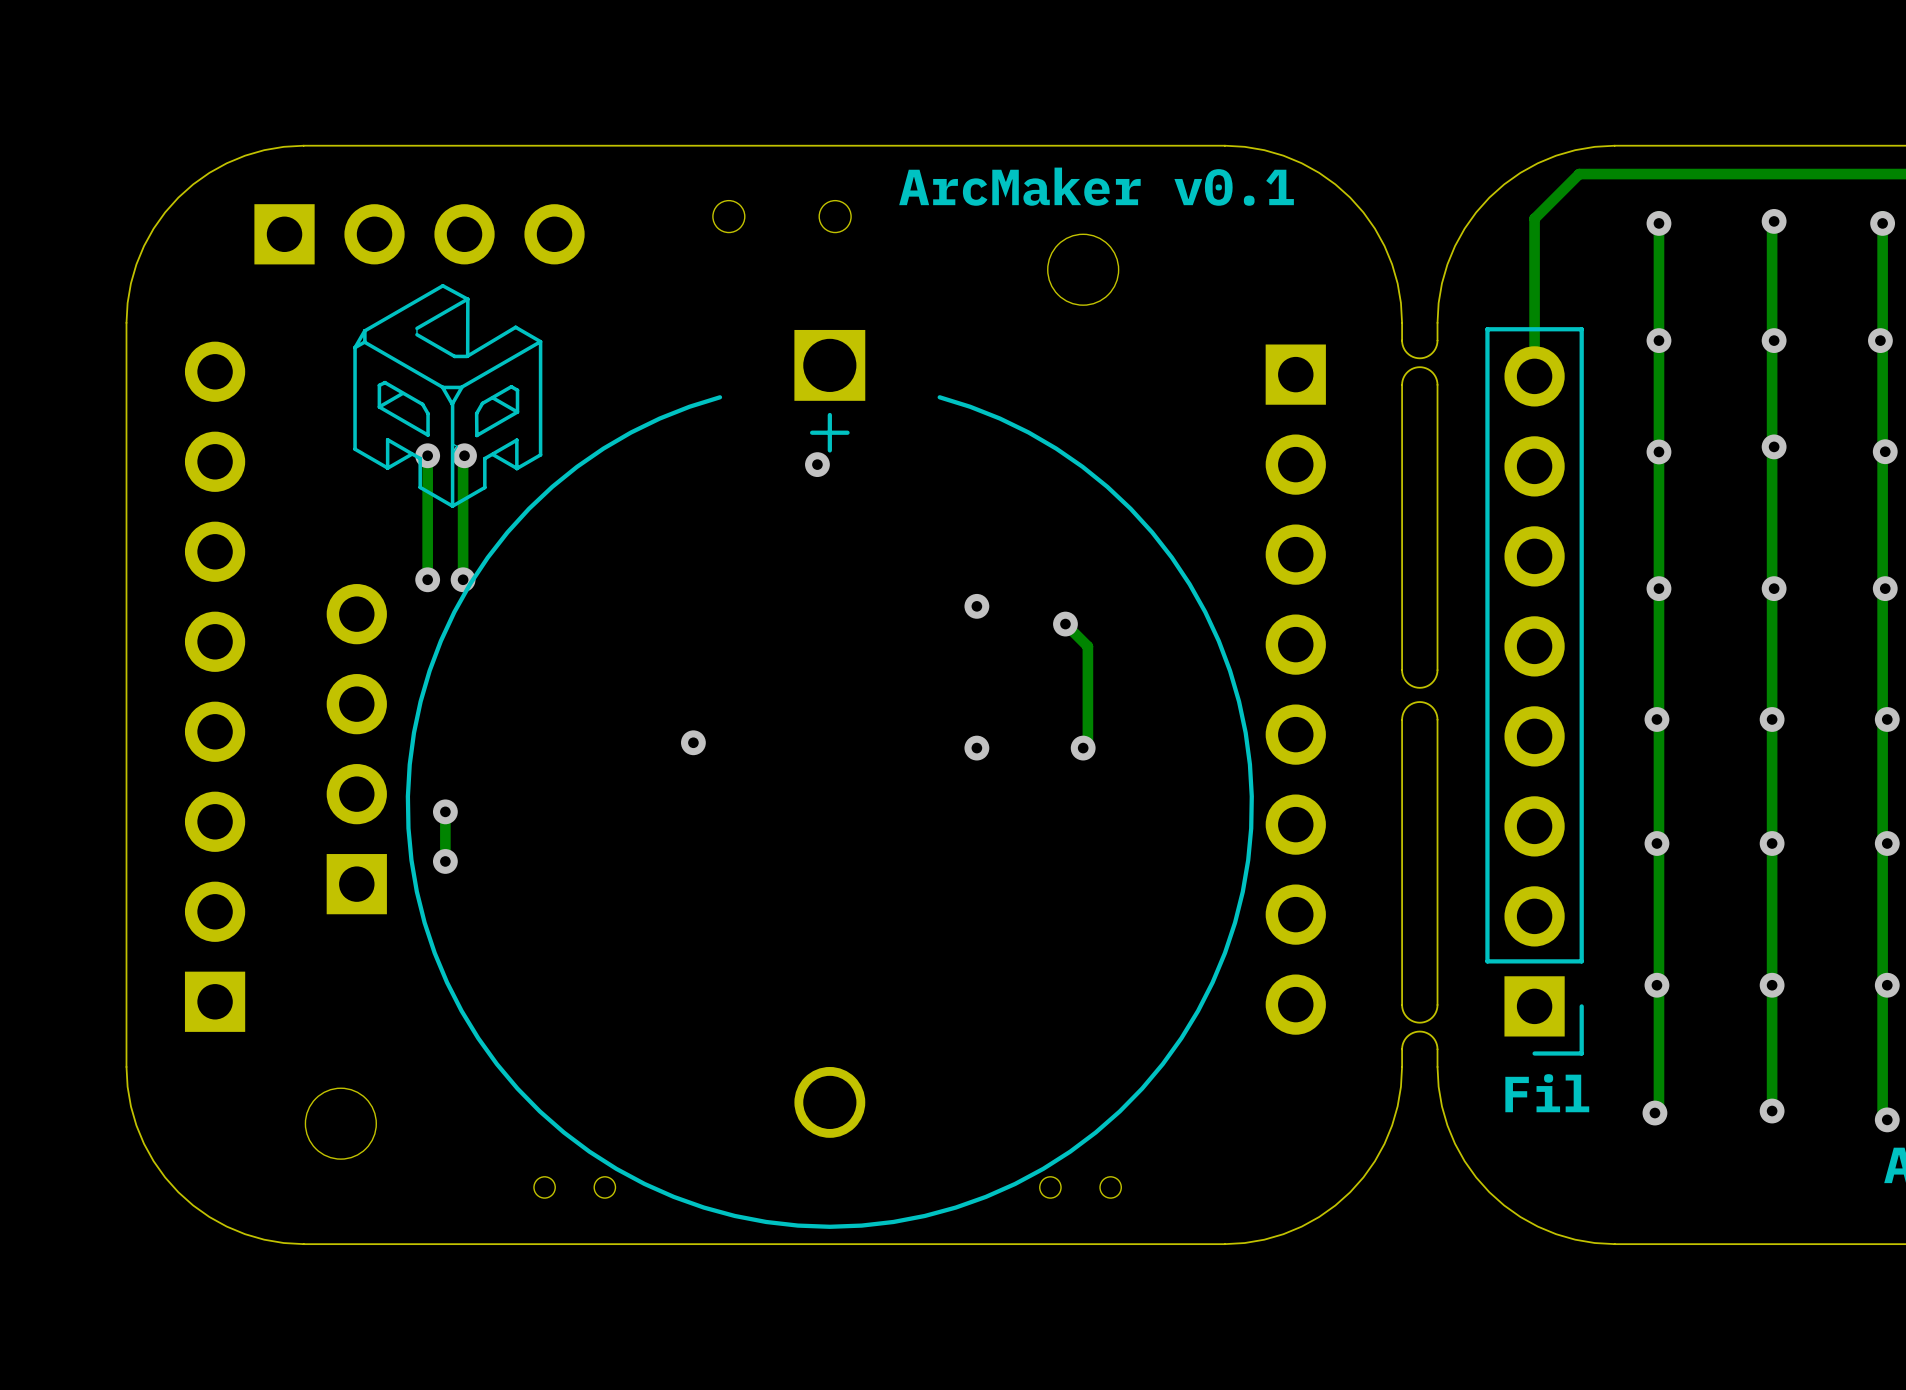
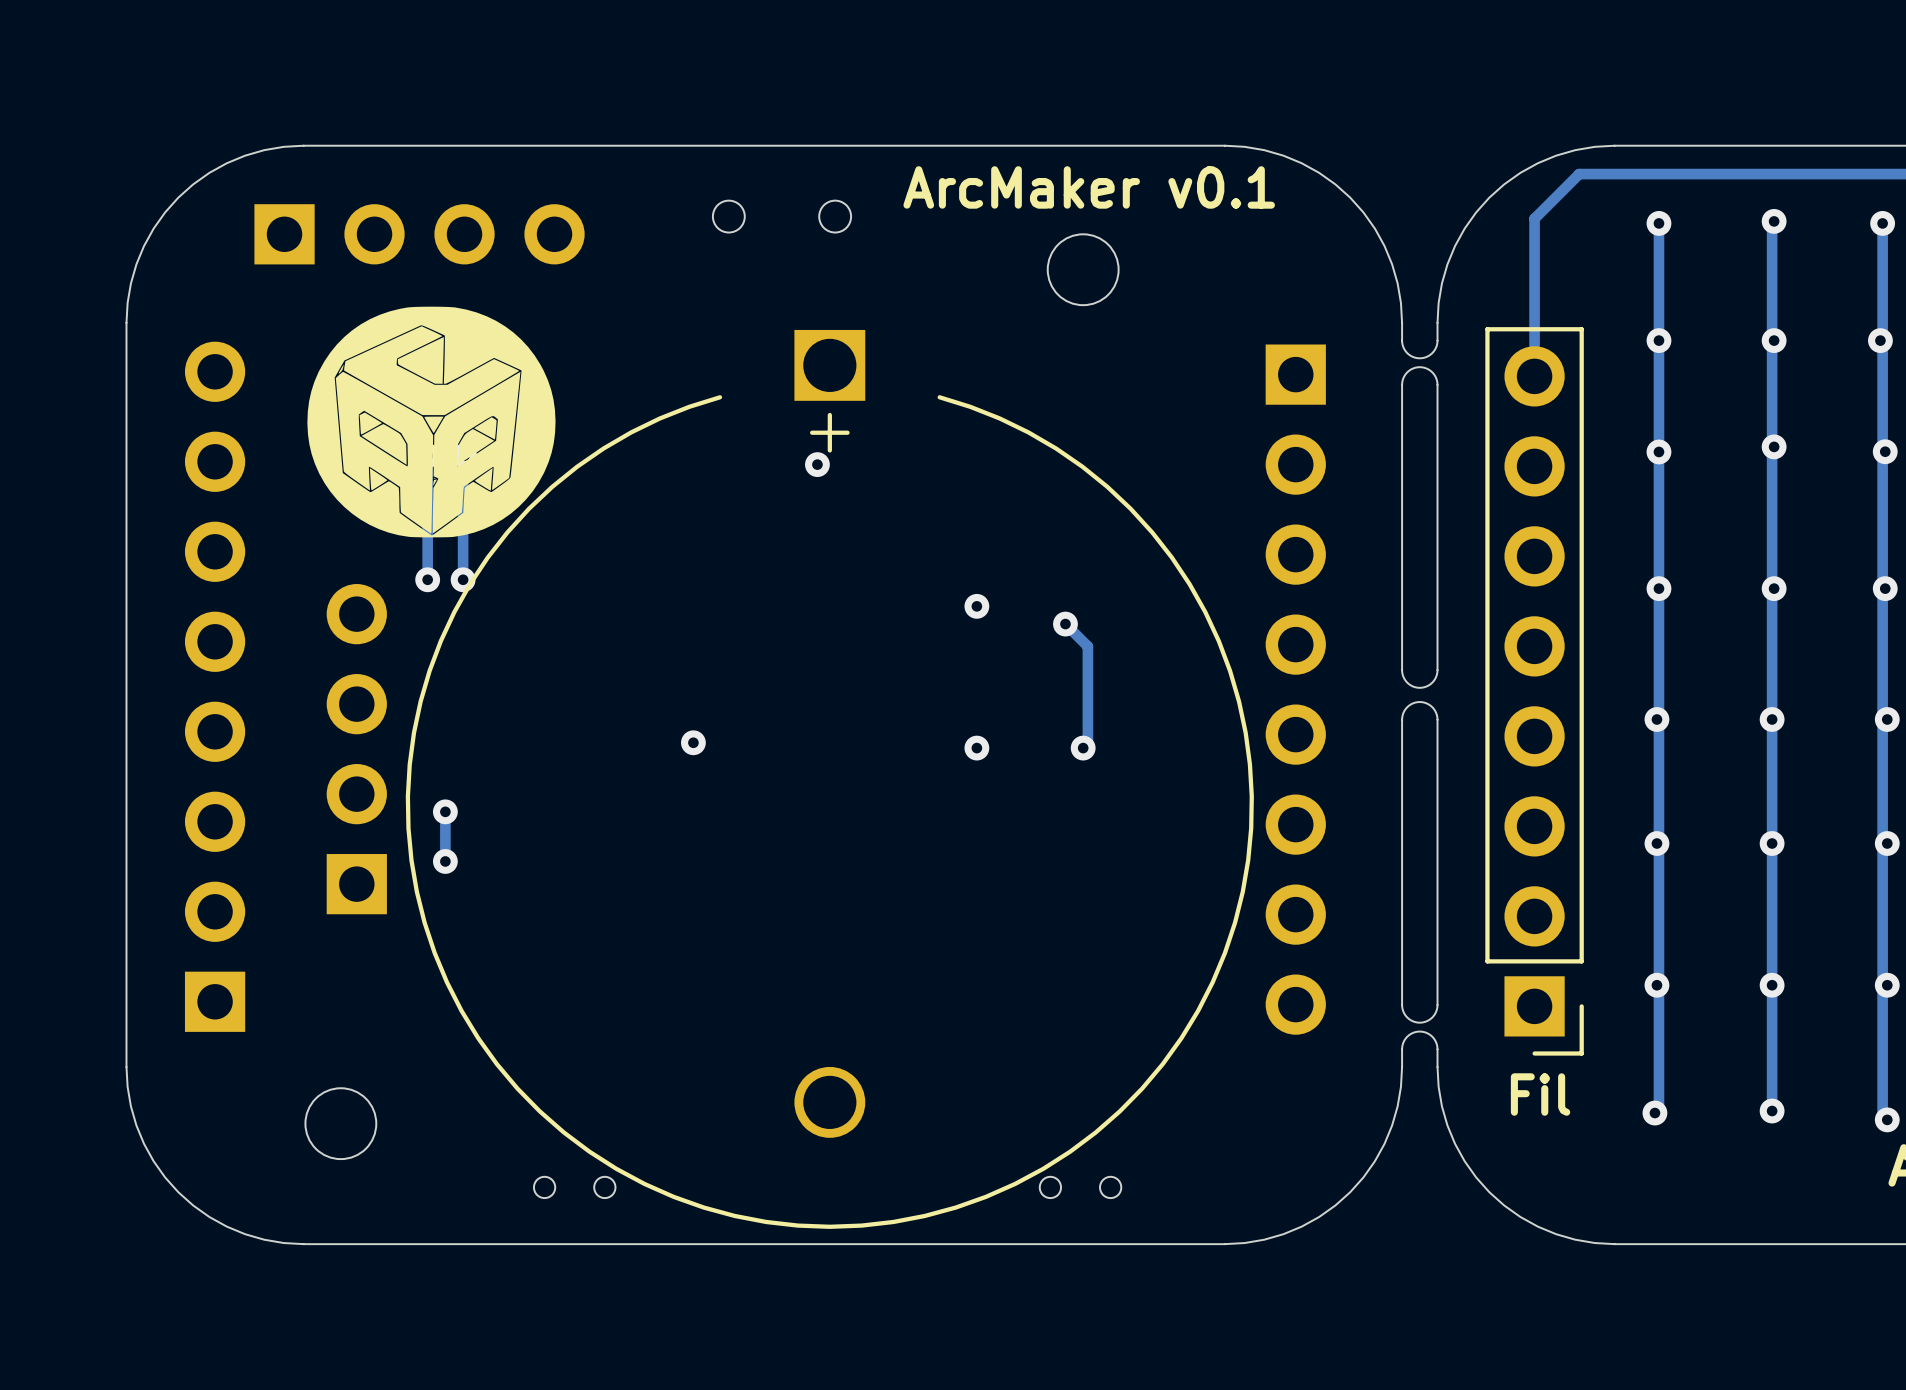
line: (467, 299) (467, 356) (515, 327) (540, 341) (540, 454) (516, 468) (516, 440) (484, 458) (484, 487) (452, 506) (420, 487) (420, 458) (387, 439) (387, 468) -> none
line: (467, 299) (442, 285) (364, 330) (355, 347) (355, 449) (387, 468) -> none
line: (467, 299) (416, 328) (416, 334) (454, 356) (467, 356) -> none
drawing: none -> [307, 306, 556, 538]
line: (540, 341) (461, 387) (443, 387) (364, 342) -> none
line: (384, 382) (379, 385) (379, 407) (428, 435) (428, 413) (422, 404) (384, 382) -> none
line: (511, 386) (482, 403) (476, 413) (476, 435) (517, 412) (517, 390) (511, 386) -> none
line: (442, 387) (452, 404) (461, 387) -> none
line: (402, 393) (379, 406) -> none
line: (493, 397) (516, 411) -> none
line: (452, 403) (452, 505) -> none
line: (452, 443) (457, 446) (452, 454) -> none
line: (411, 454) (387, 468) -> none
line: (492, 454) (516, 468) -> none

